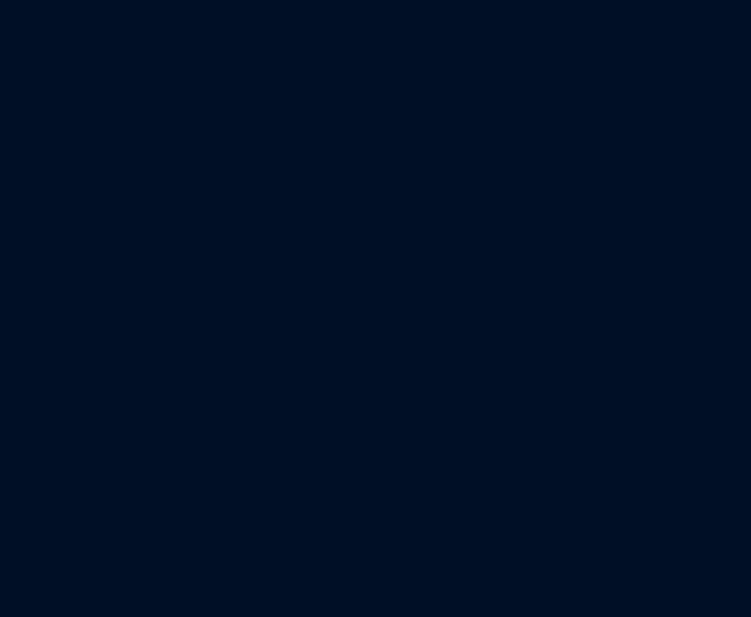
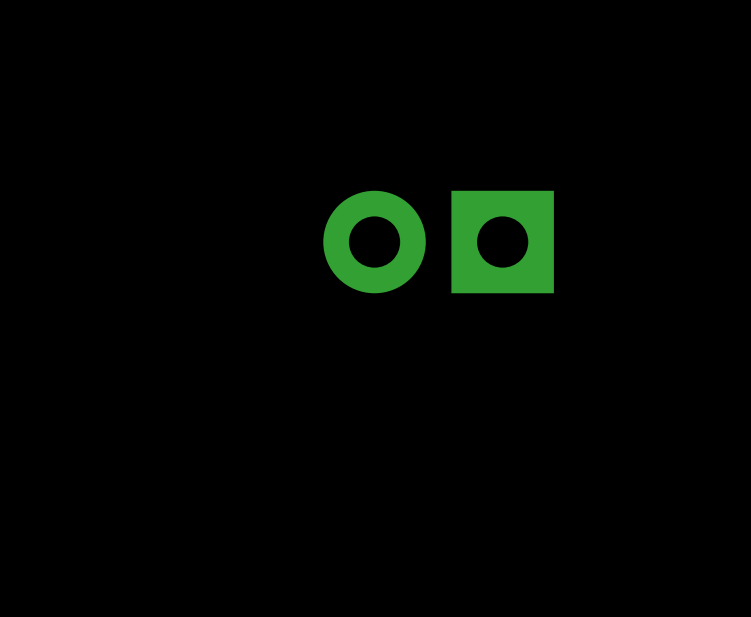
part: none -> (438, 242)

